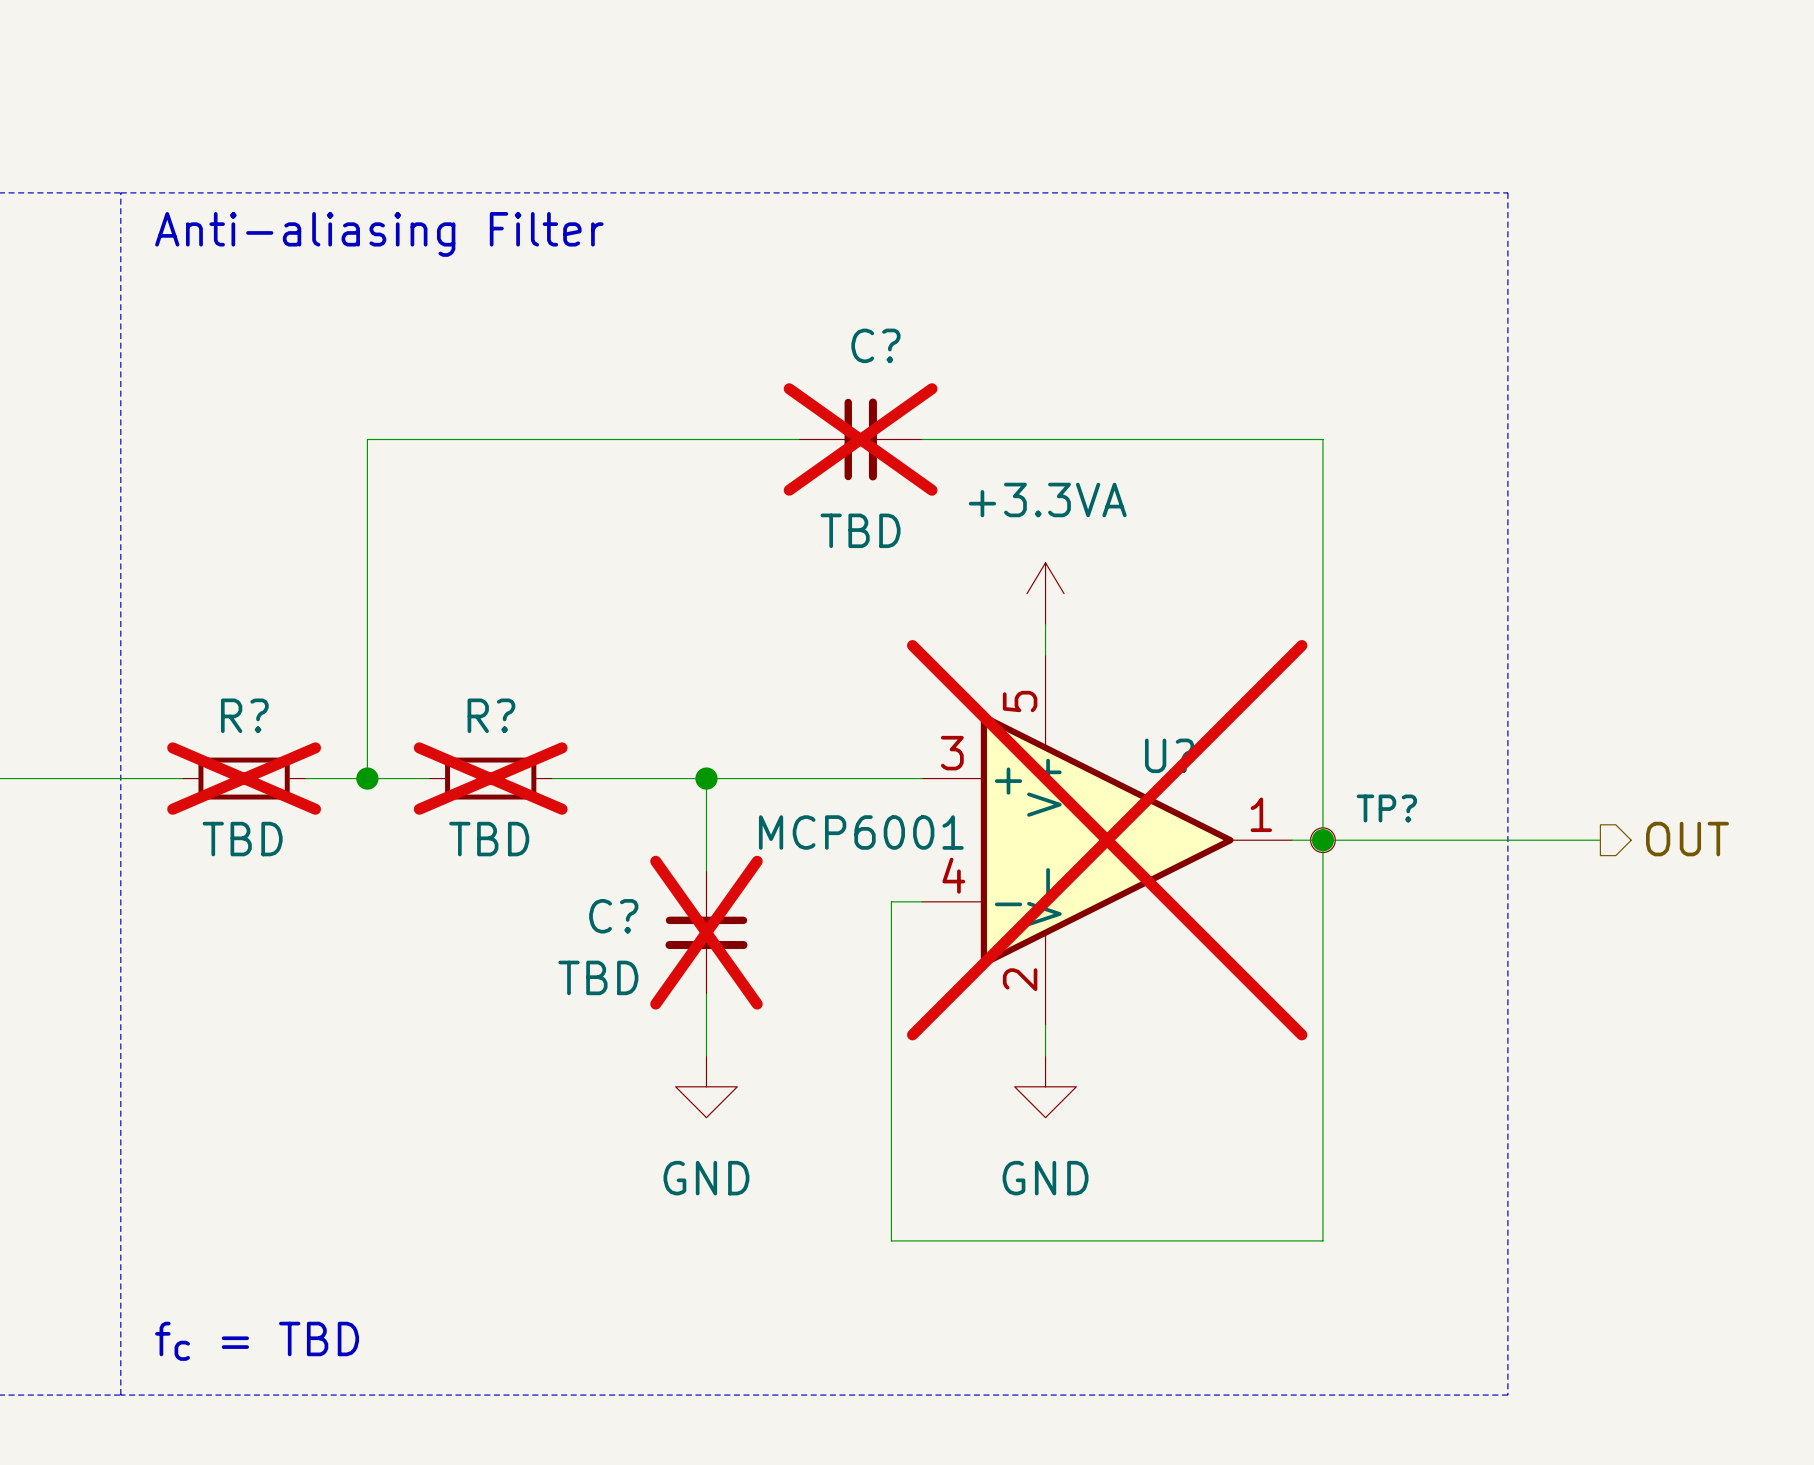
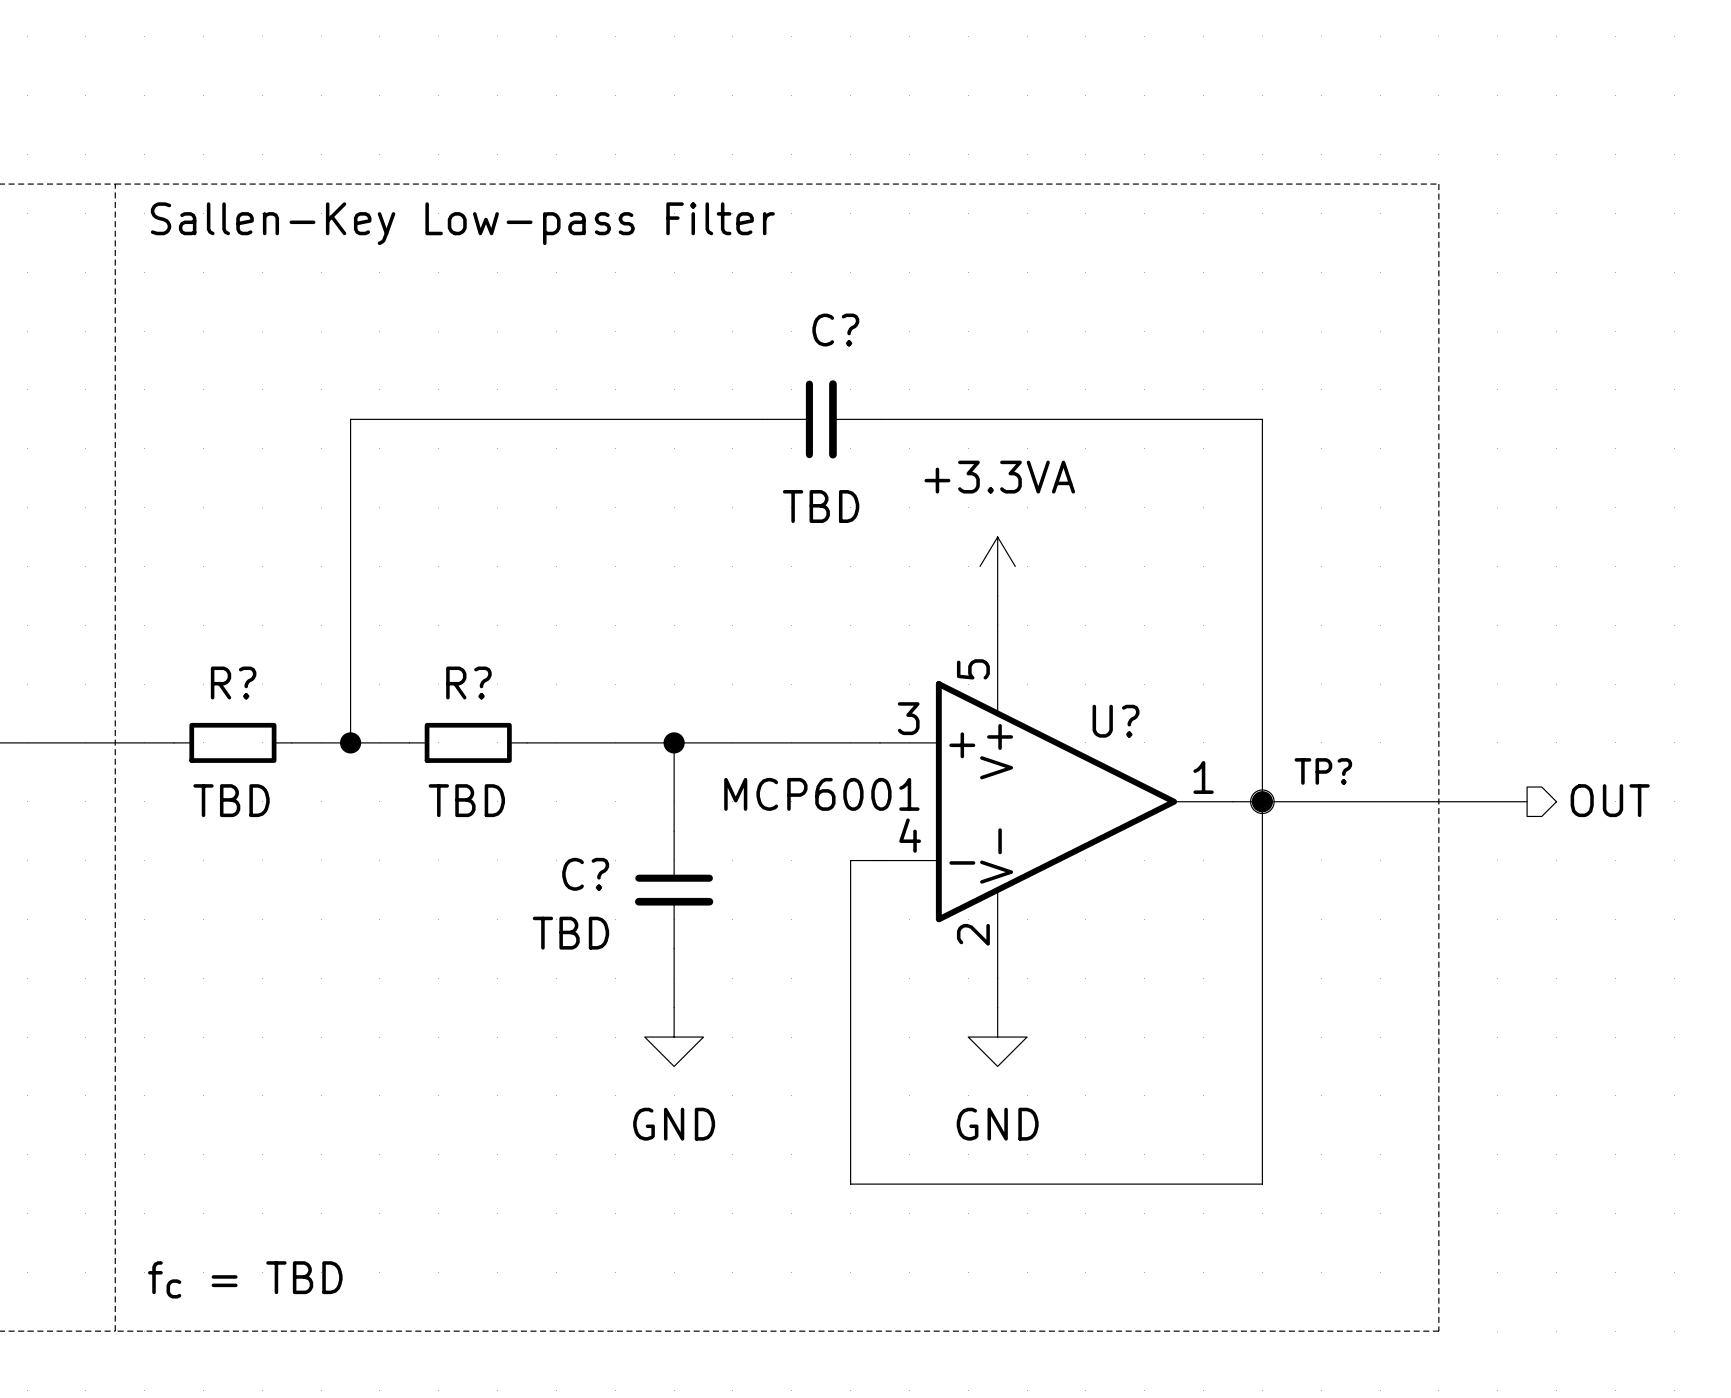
text: Anti-aliasing Filter (379, 234) -> Sallen-Key Low-pass Filter (462, 223)
C? do-not-place cross: (860, 439) -> none
R? do-not-place cross: (244, 778) -> none
R? do-not-place cross: (490, 778) -> none
U? do-not-place cross: (1107, 840) -> none
C? do-not-place cross: (706, 932) -> none

